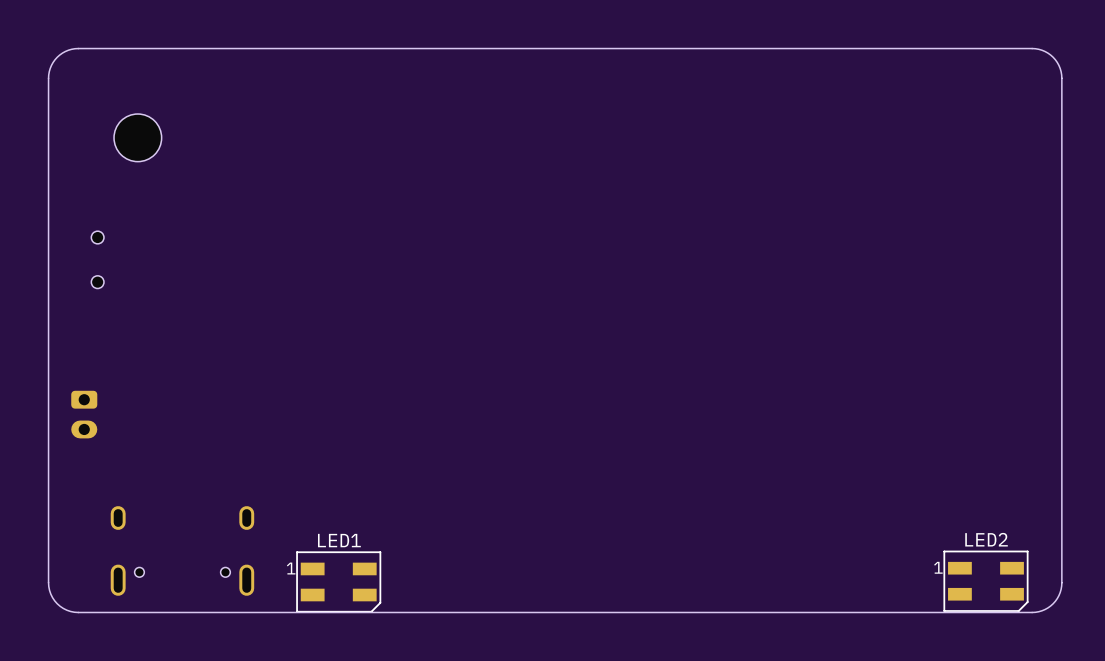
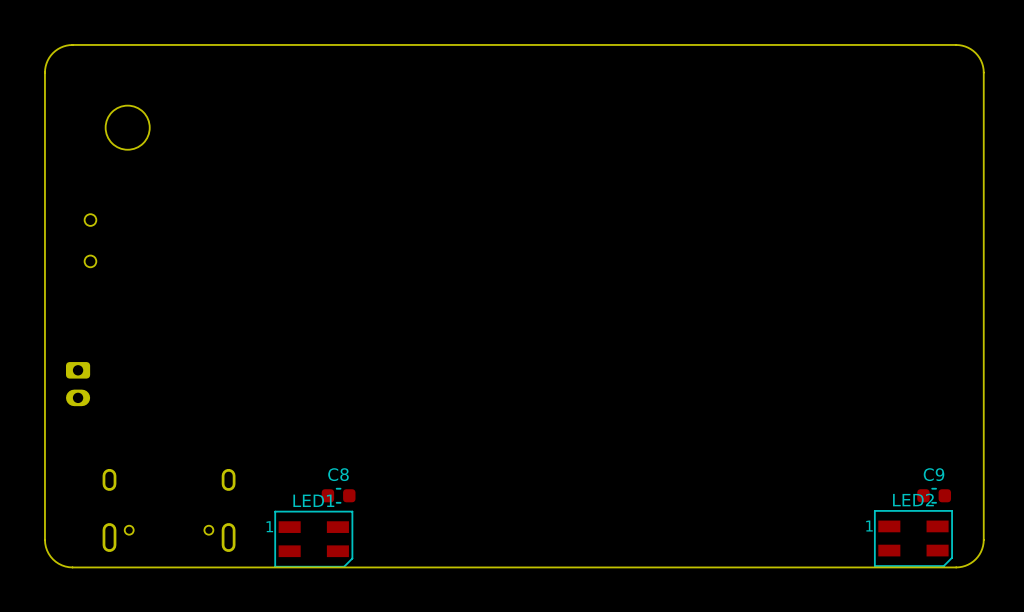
C8: none -> (338, 495)
C9: none -> (934, 495)

